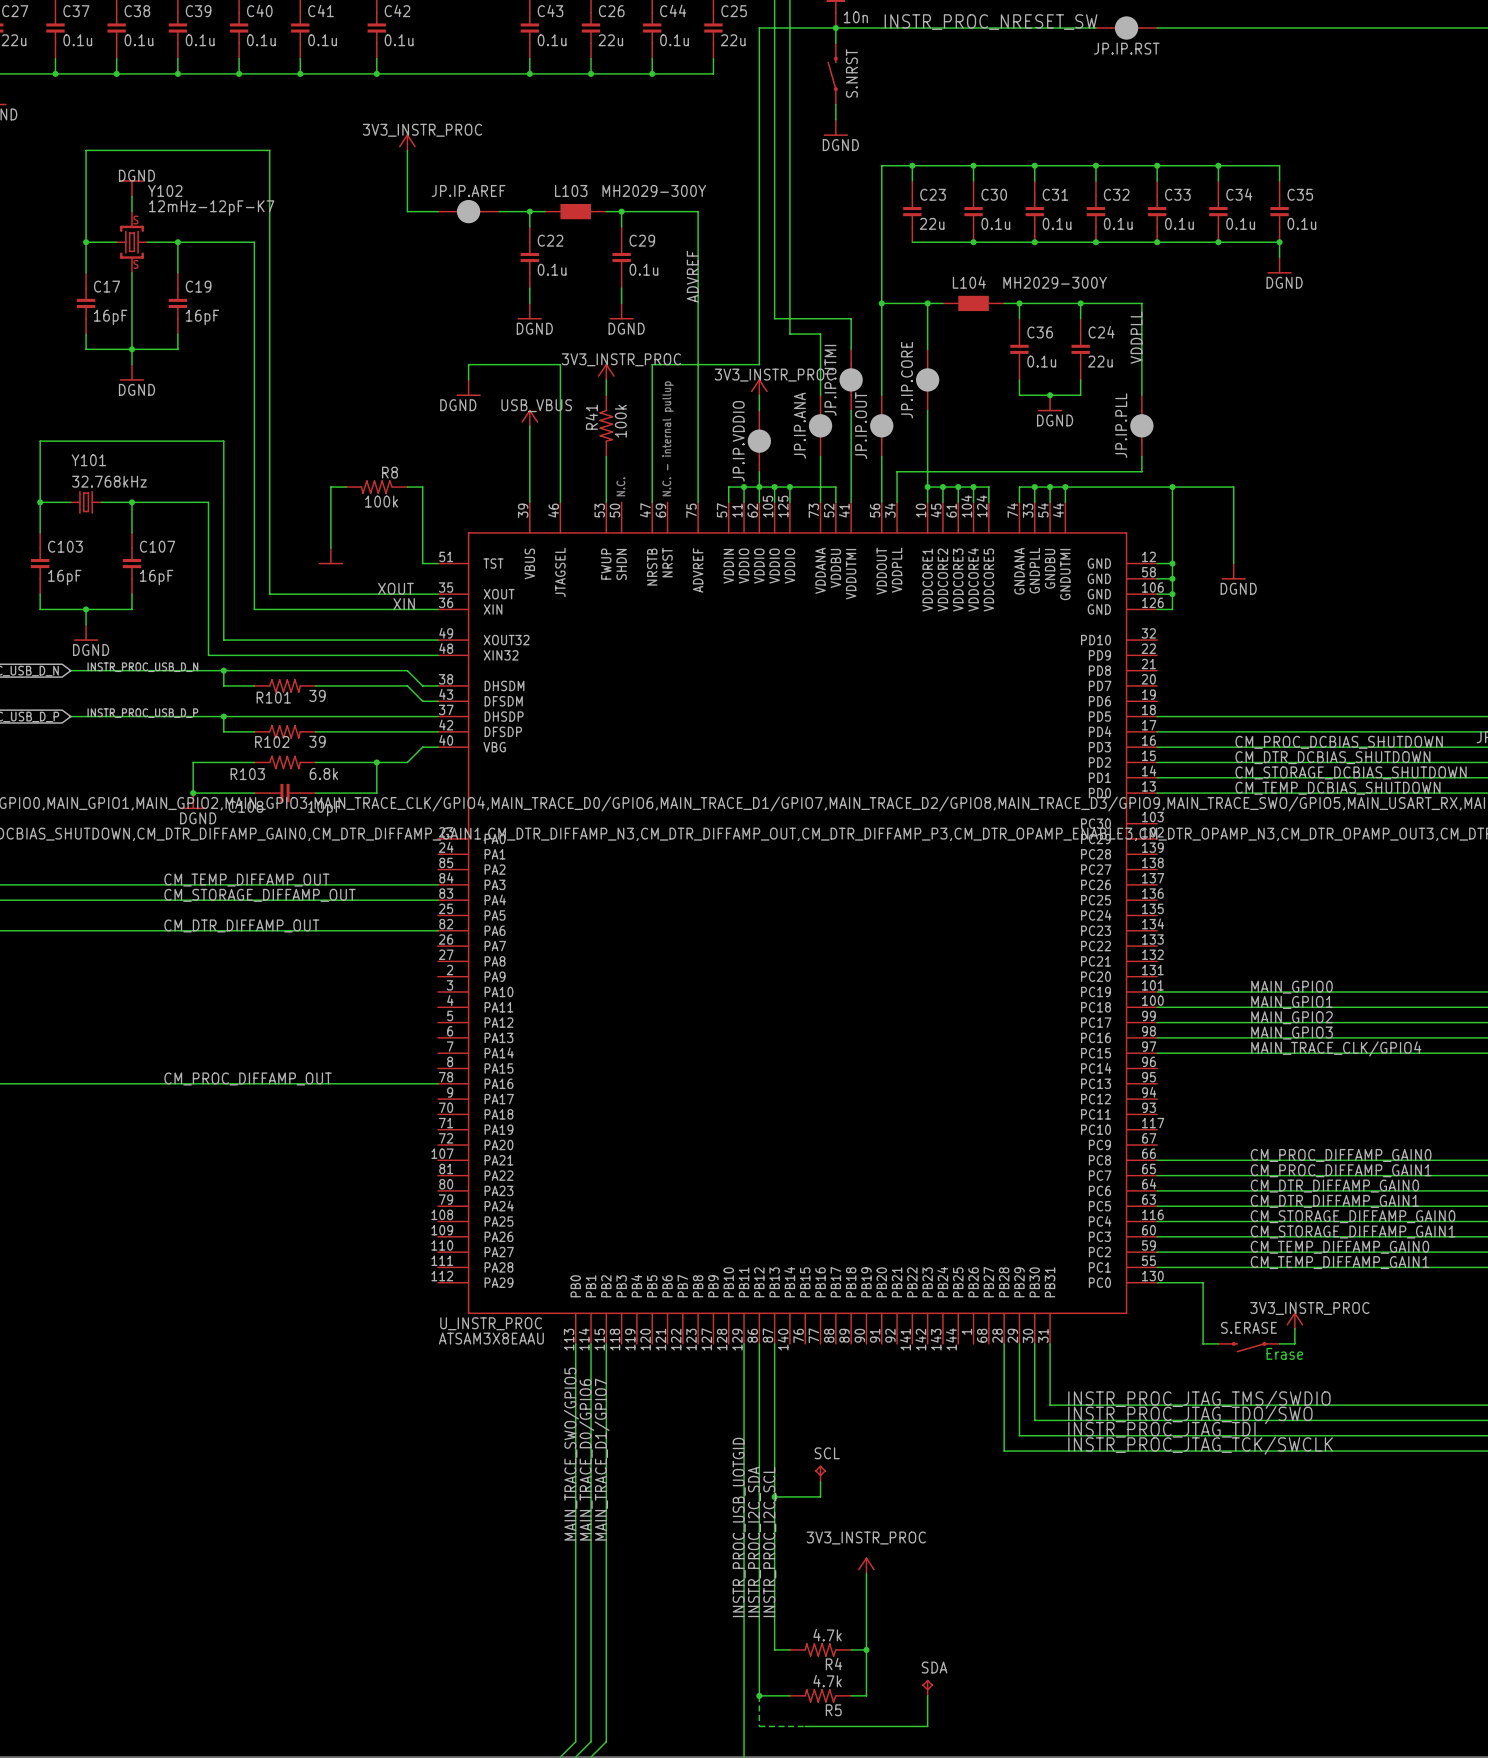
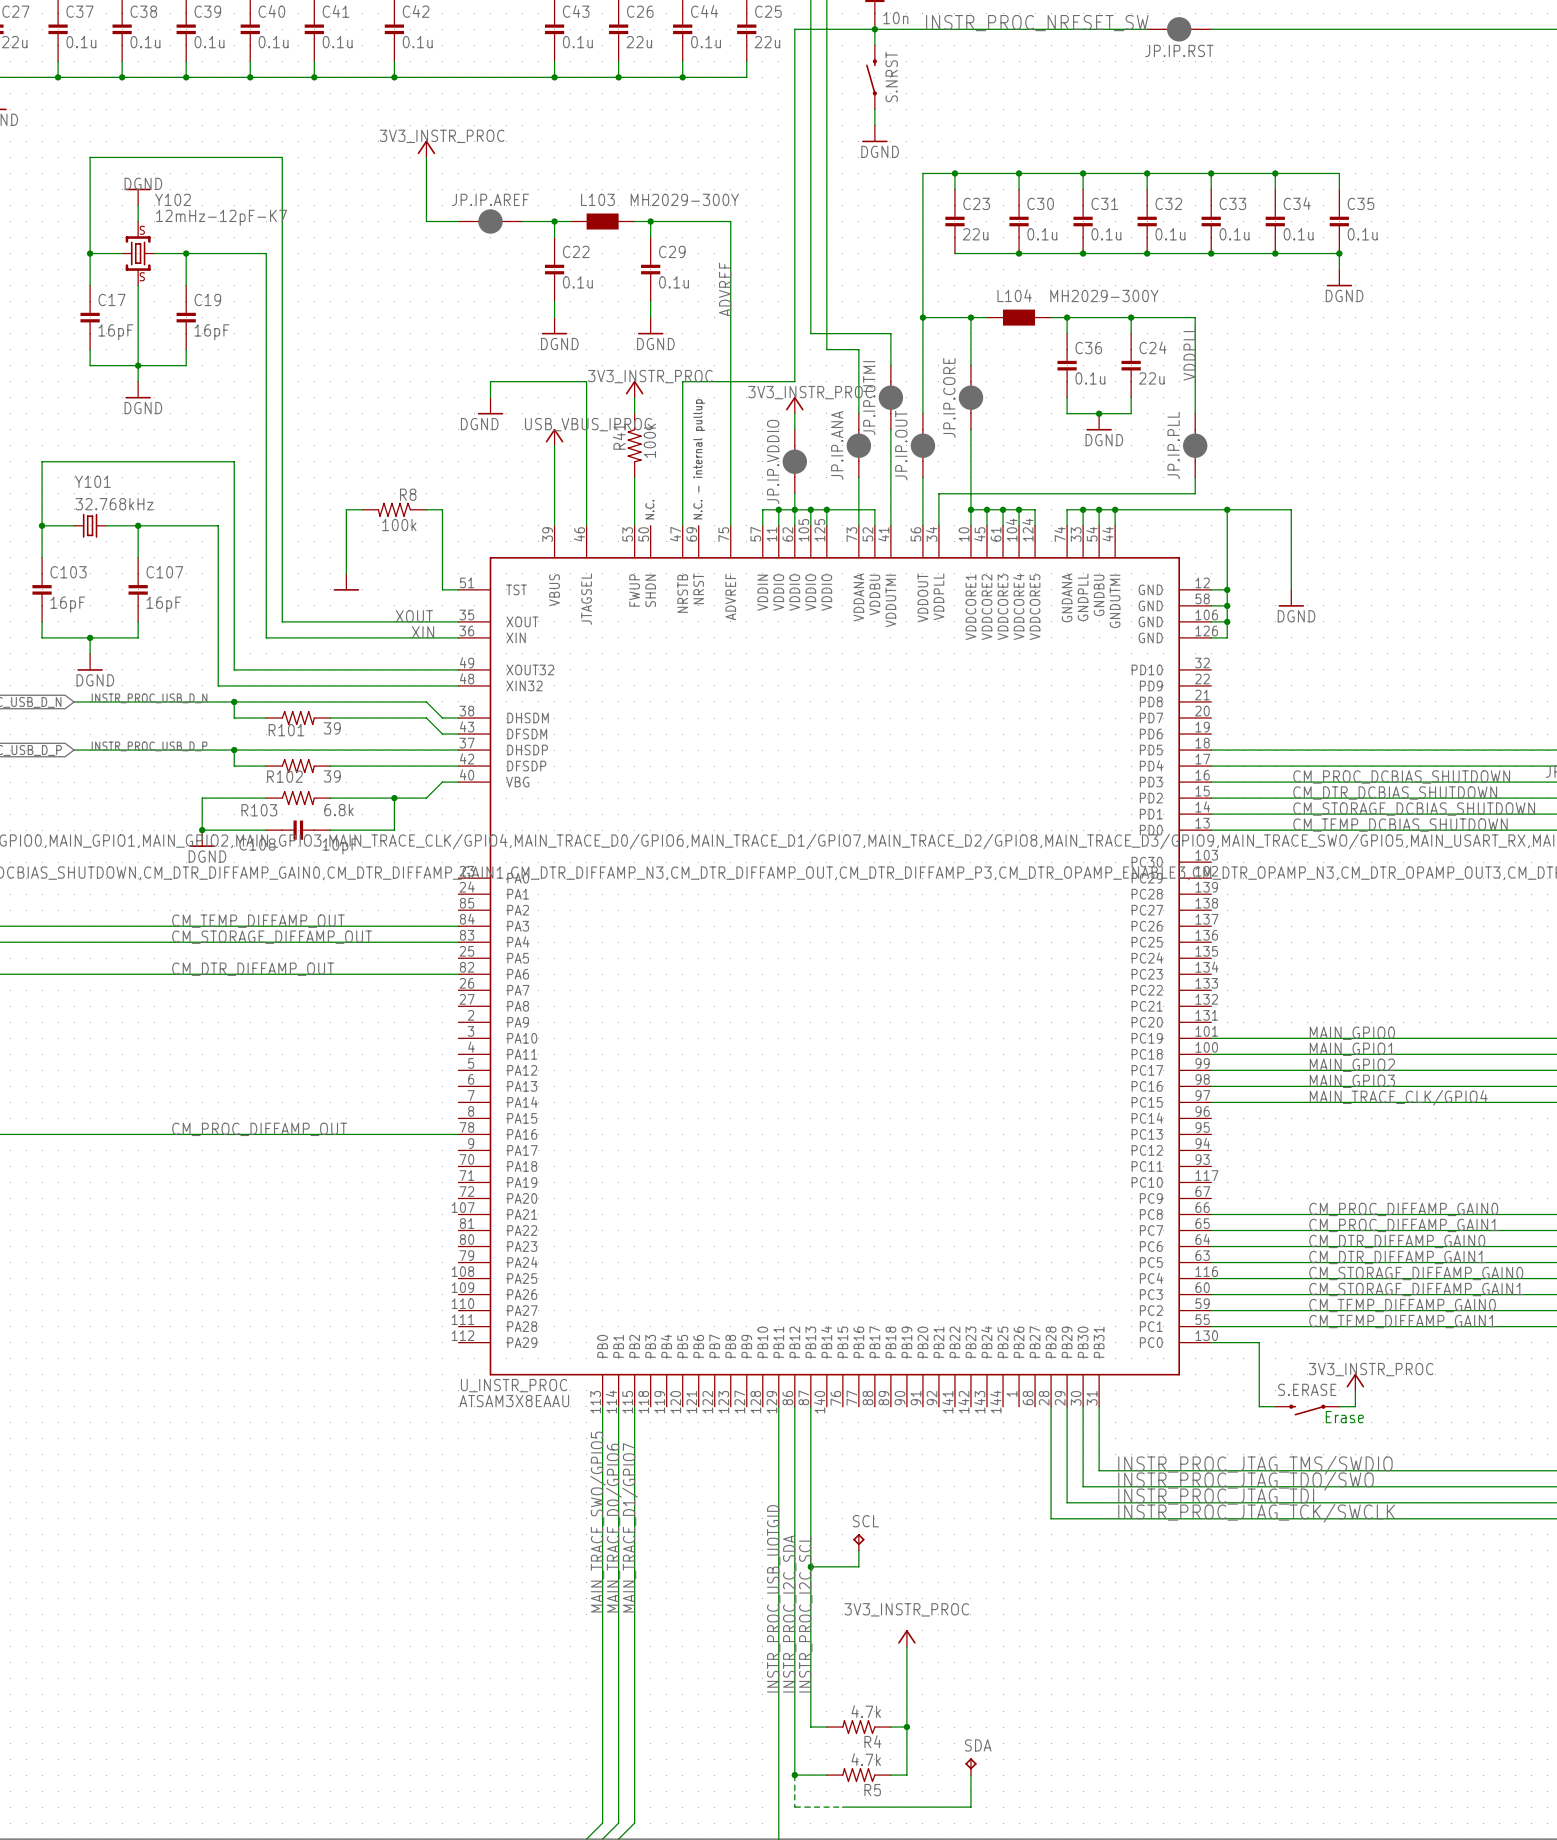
label: USB_VBUS (536, 405) -> USB_VBUS_IPROC (588, 424)

